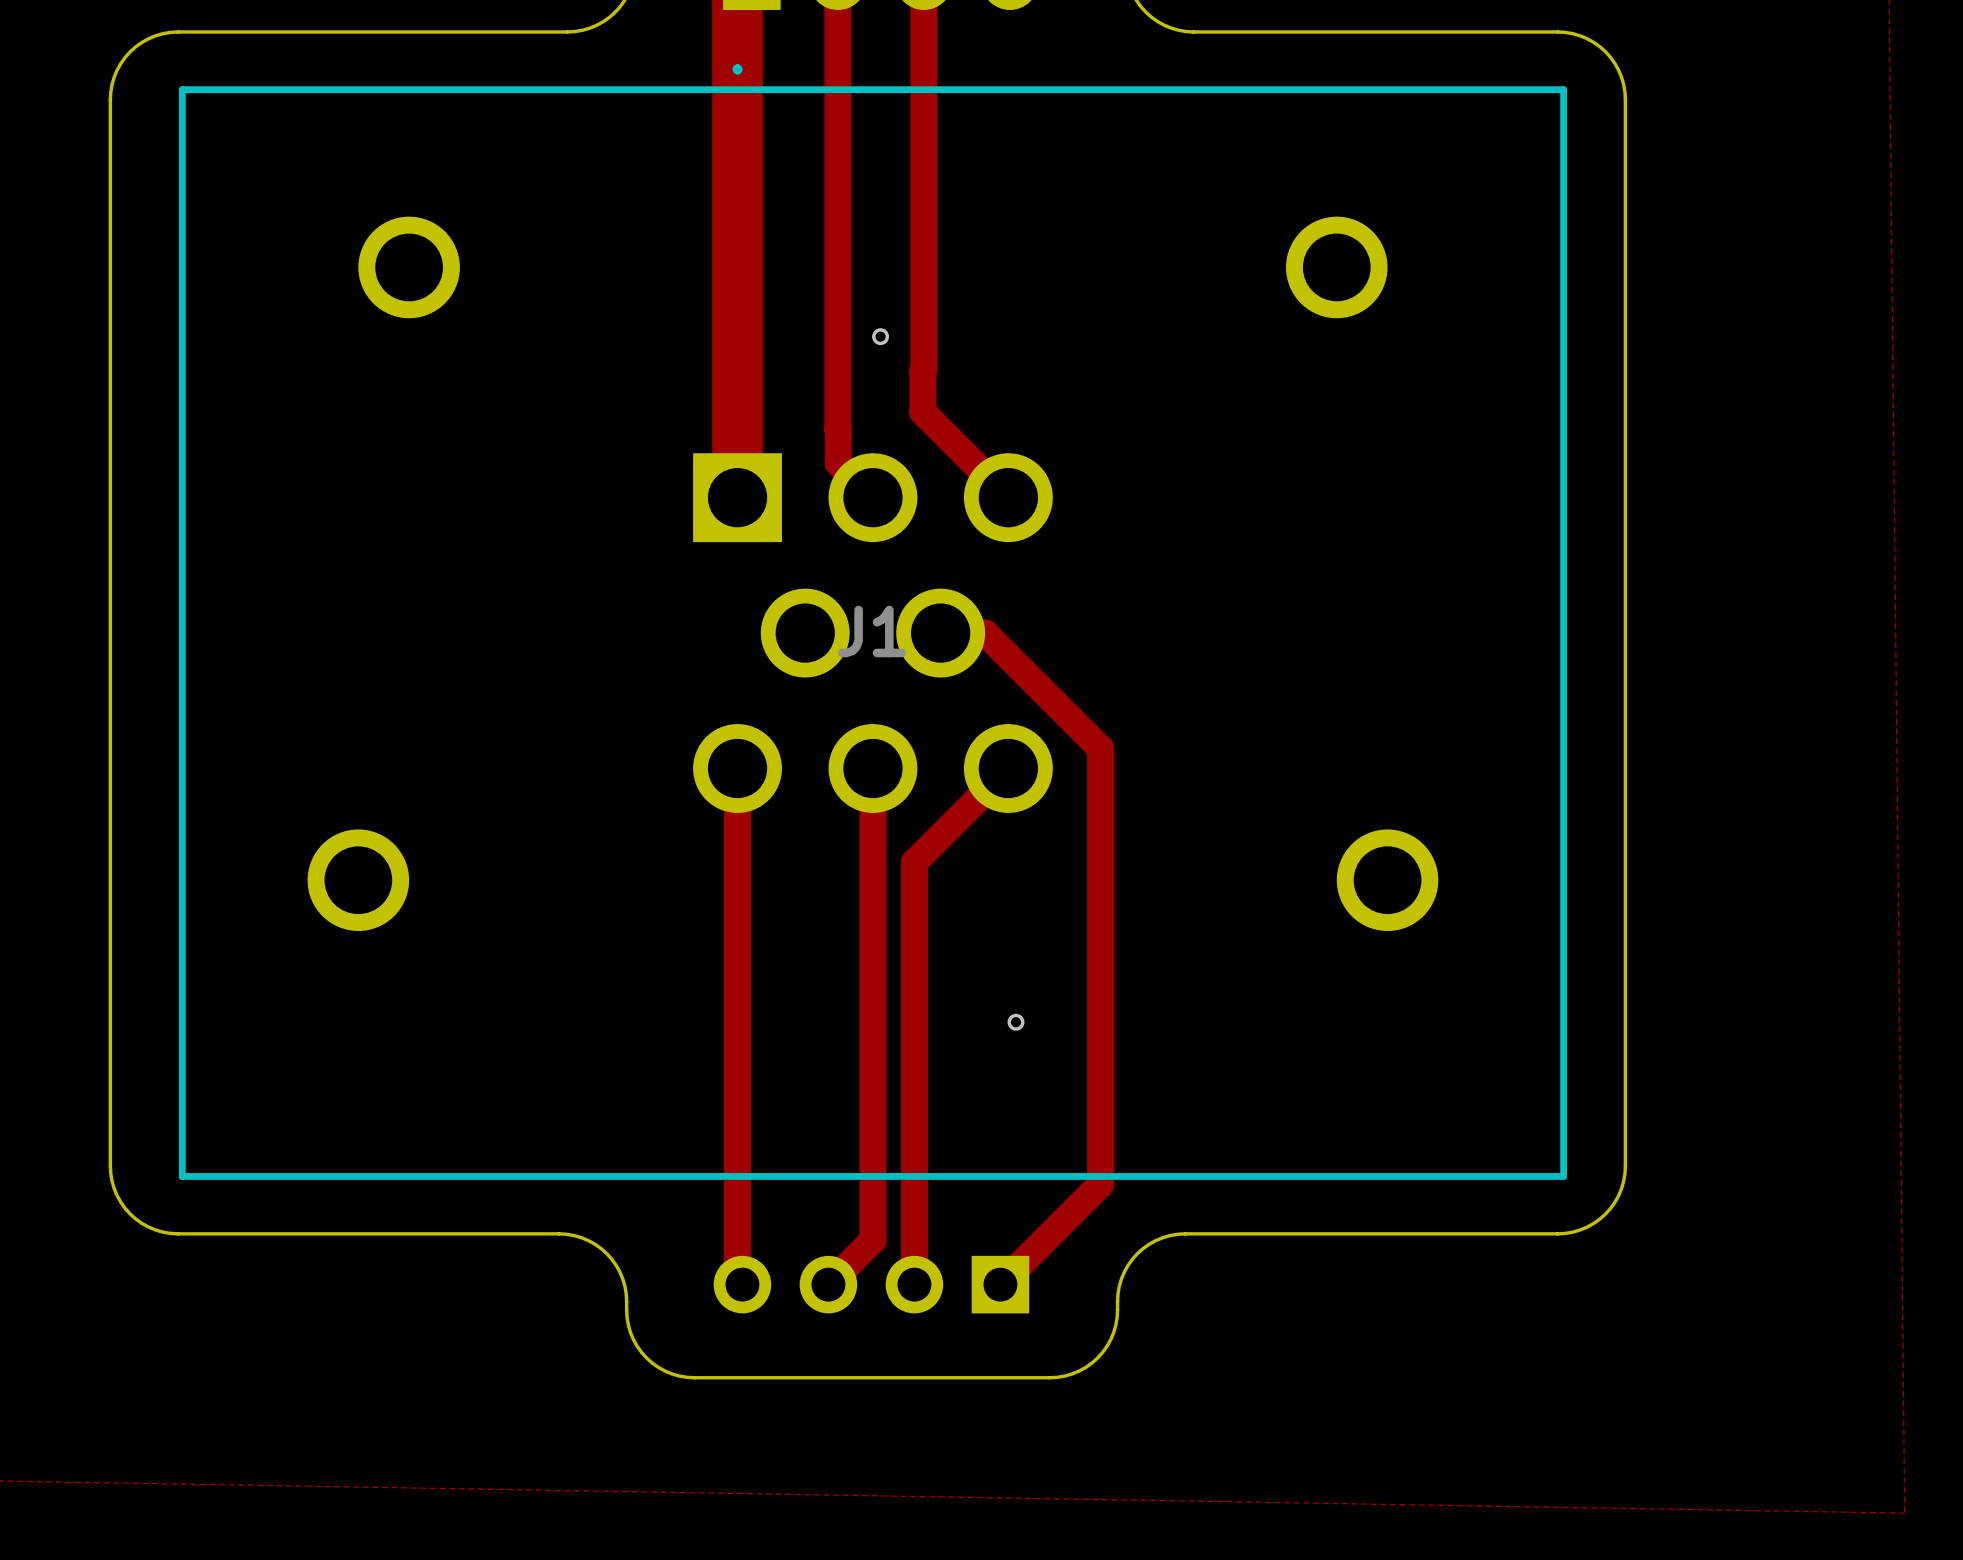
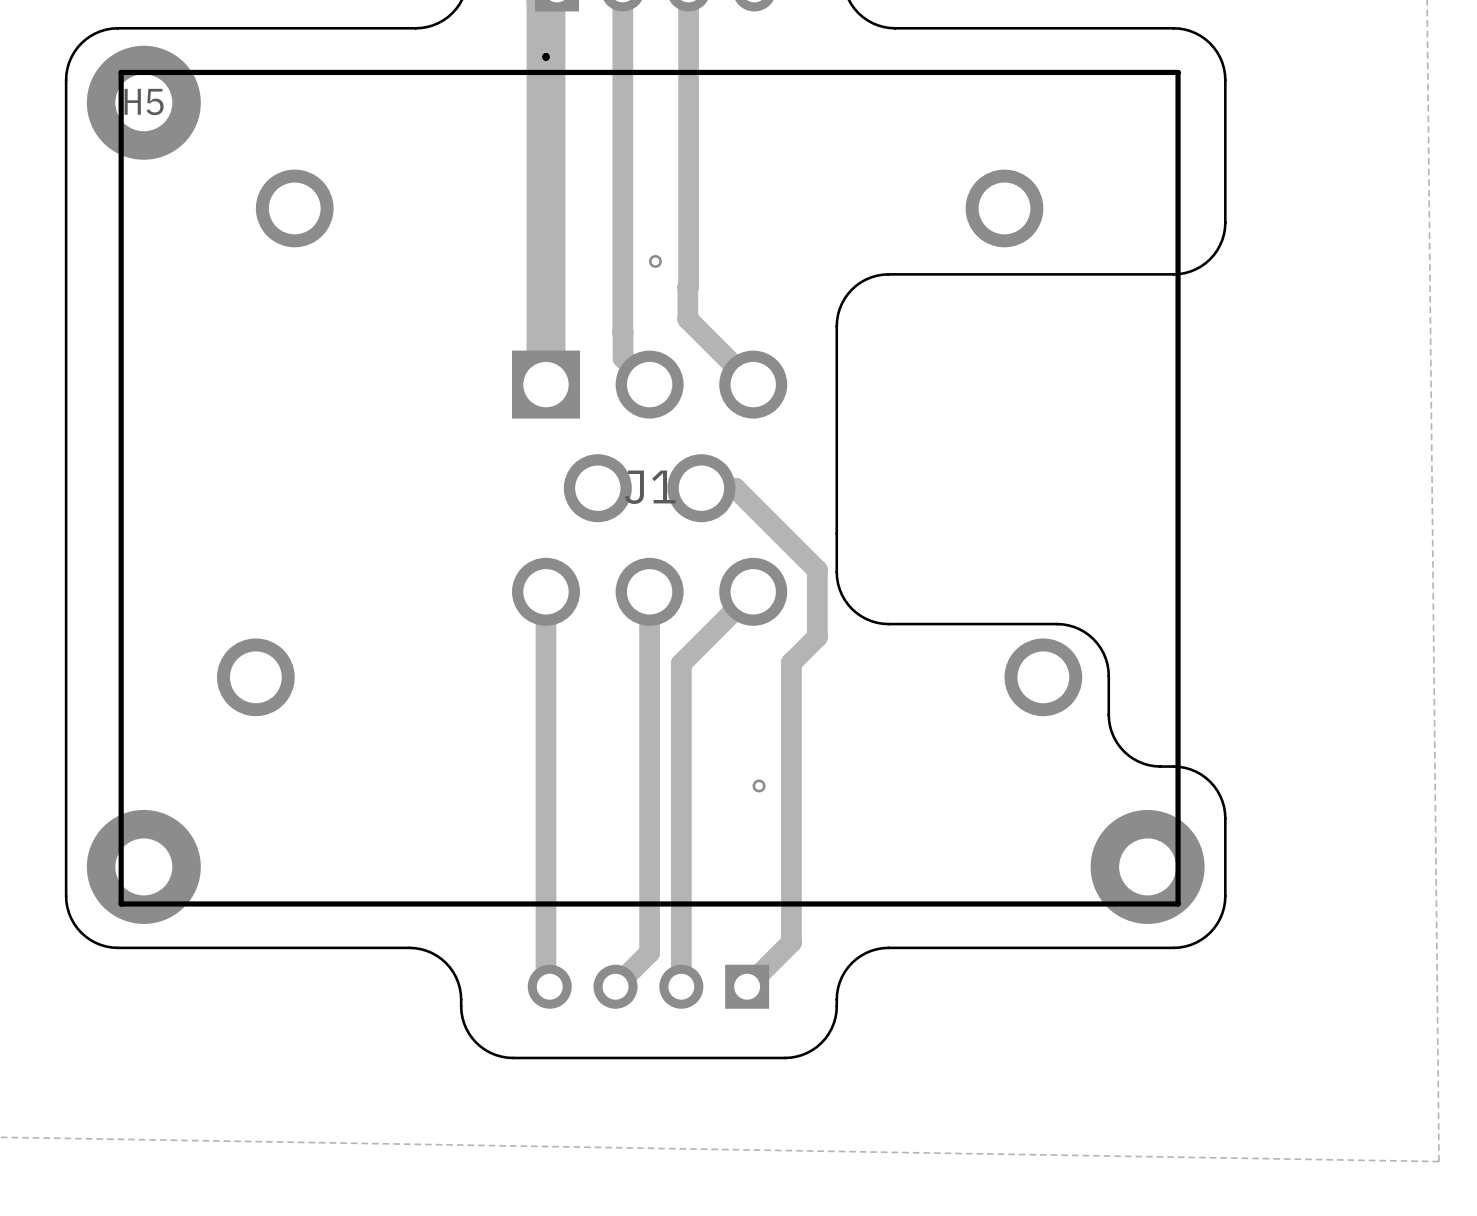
H5: none -> (143, 102)
board edge: (1625, 285) (1625, 1064) -> (1225, 222) (1220, 245) (1210, 259) (1196, 269) (1179, 274) (877, 275) (861, 282) (848, 293) (839, 309) (836, 326) (836, 572) (839, 589) (848, 604) (861, 616) (882, 623) (1056, 624) (1074, 626) (1084, 632) (1097, 643) (1105, 658) (1108, 675) (1109, 720) (1111, 731) (1120, 747) (1128, 755) (1143, 763) (1185, 767) (1201, 774) (1210, 781) (1220, 795) (1225, 818)
track: (1092, 740) (1100, 748) (1100, 1184) (1058, 1226) -> (817, 570) (817, 637) (791, 662) (791, 942)
part: none -> (143, 866)
part: none -> (1147, 866)

